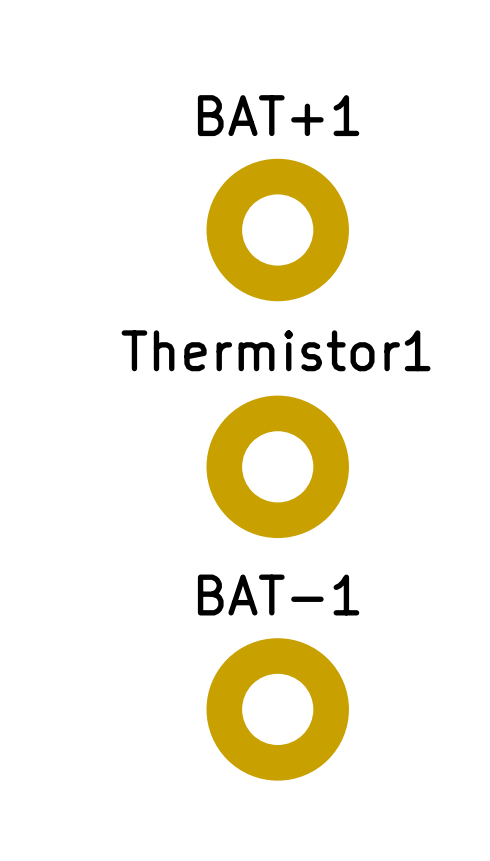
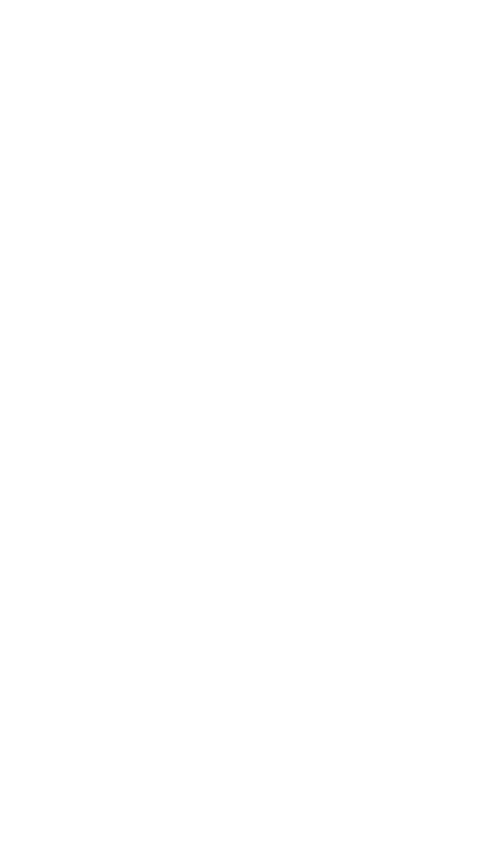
text: BAT+1 (278, 115) -> none
part: (277, 230) -> none
text: Thermistor1 (276, 350) -> none
part: (277, 466) -> none
text: BAT-1 (278, 595) -> none
part: (277, 709) -> none

